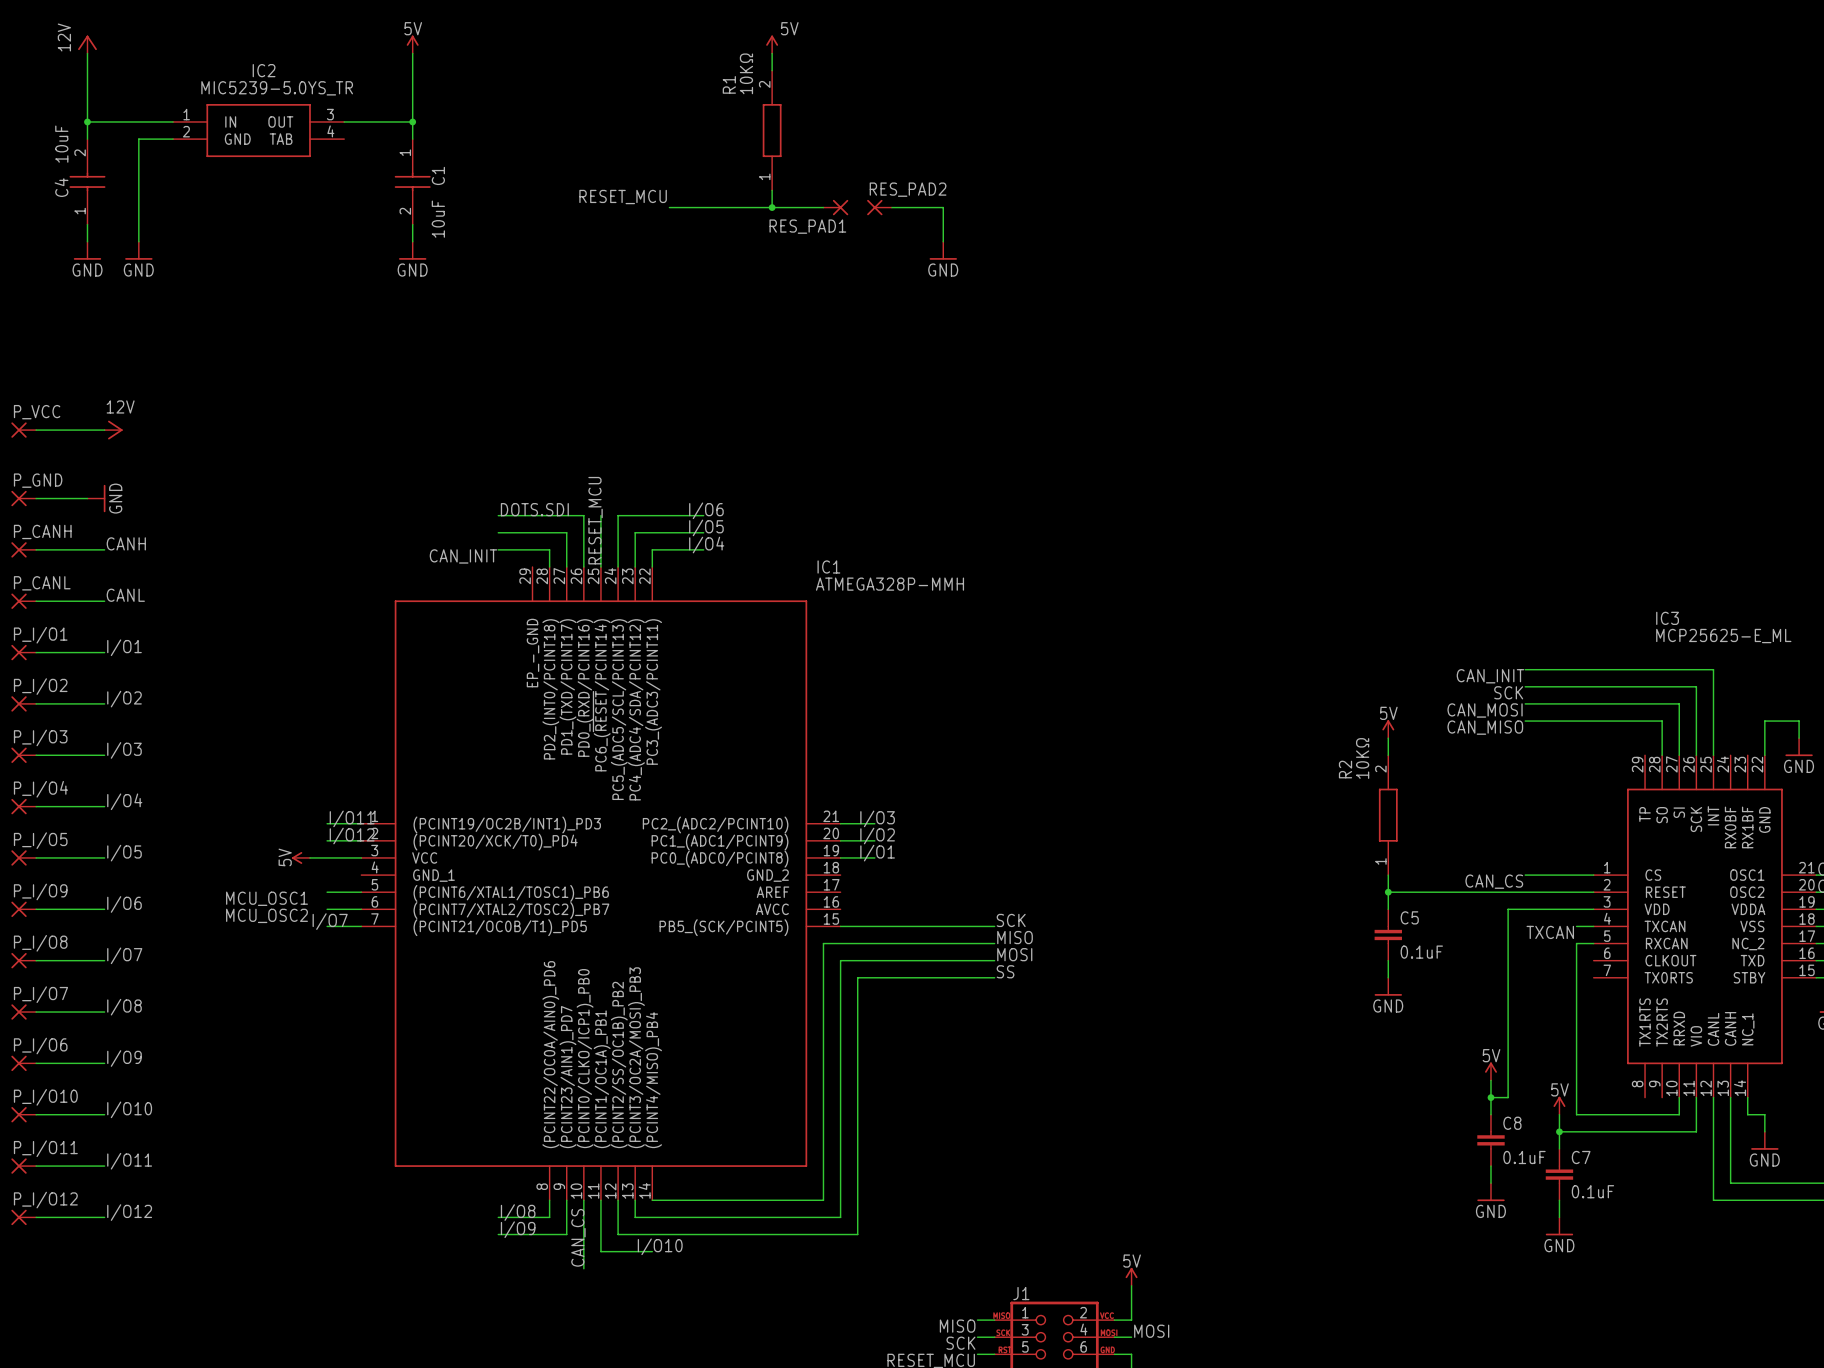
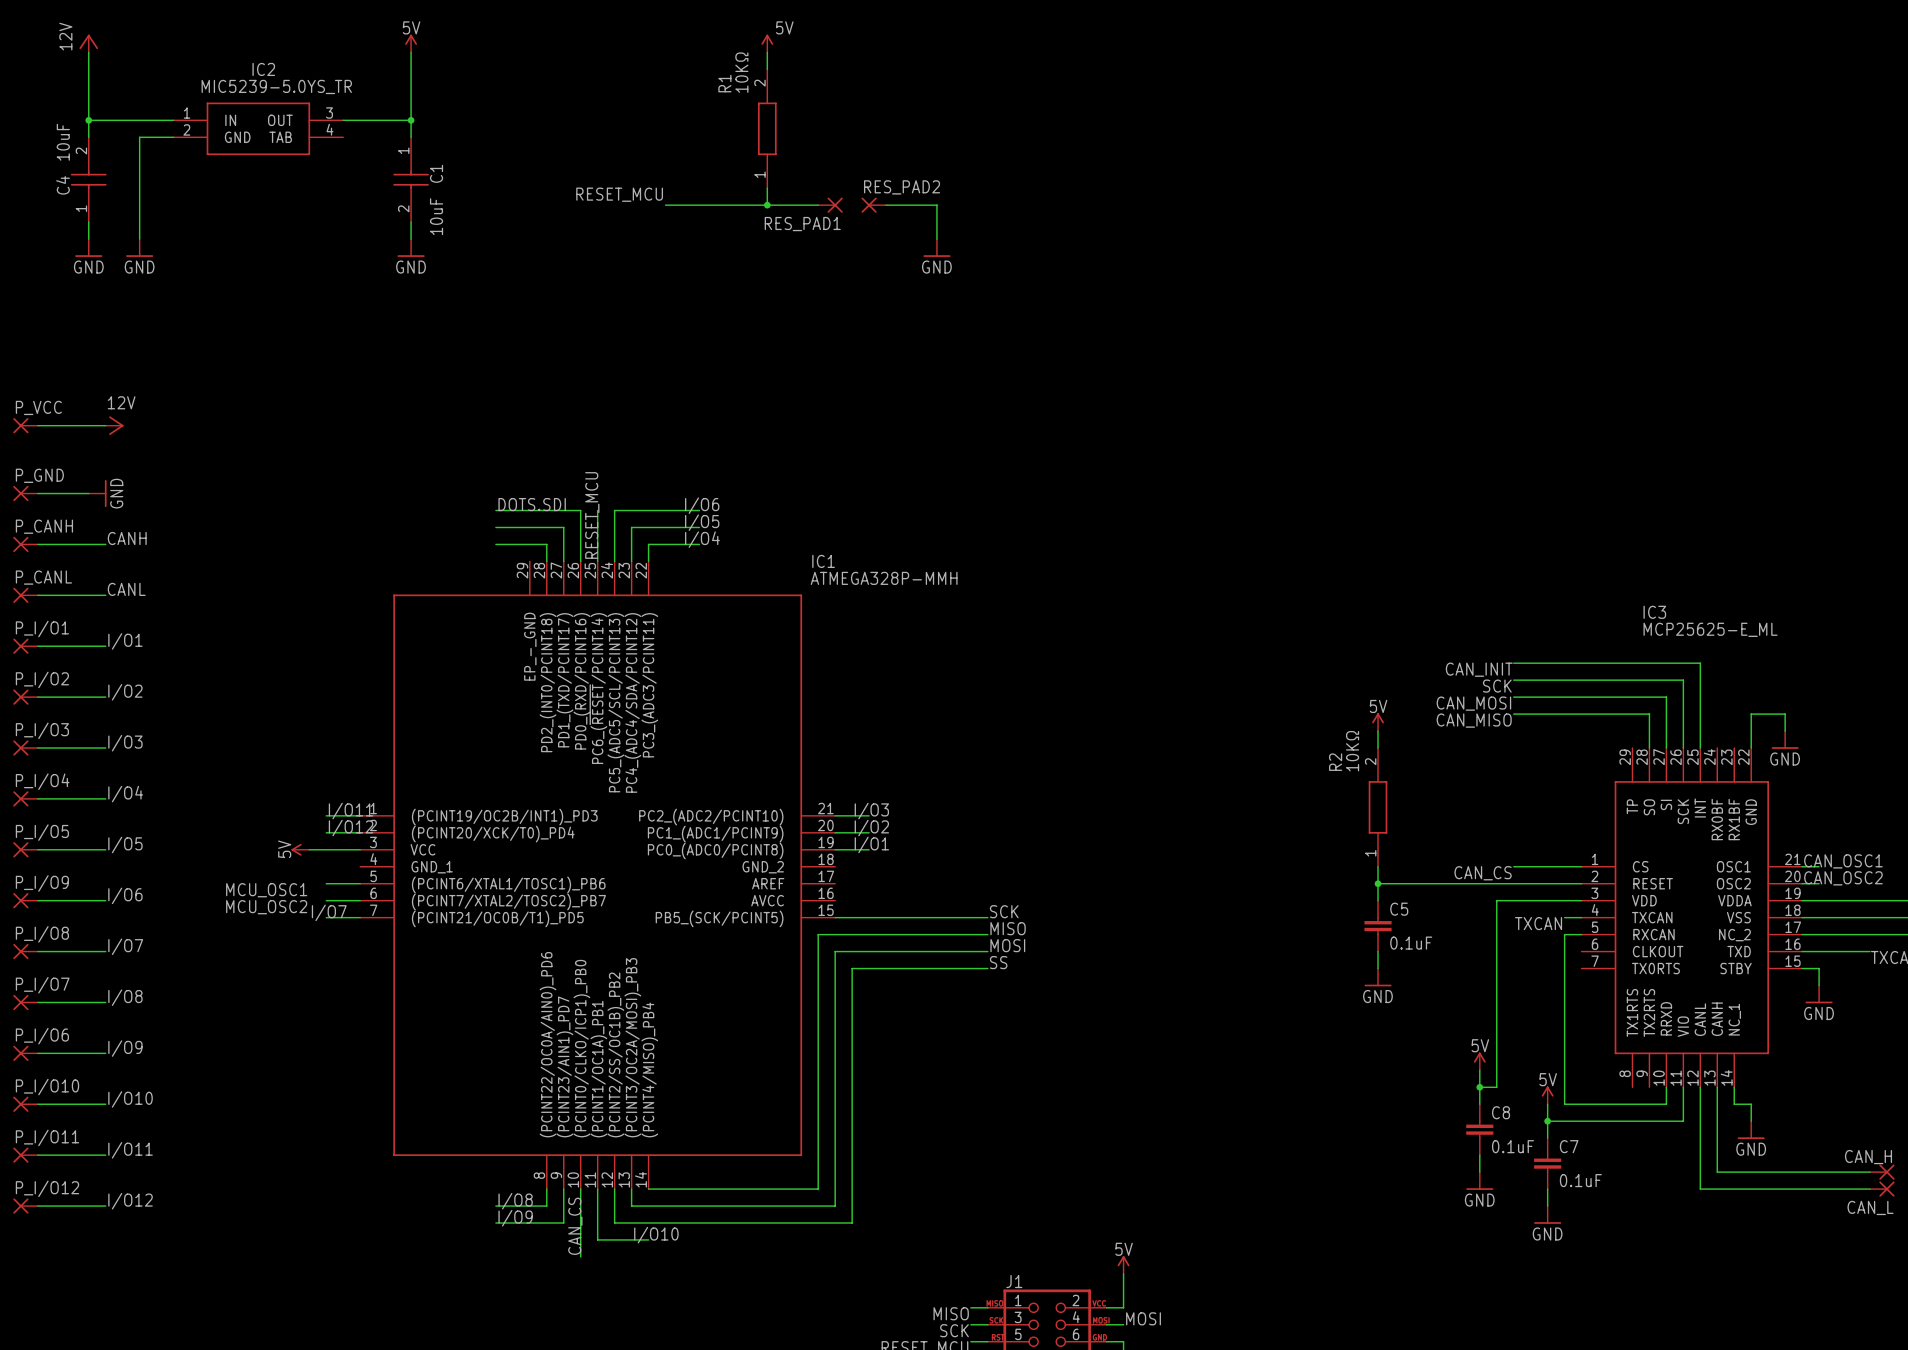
label: CAN_INIT (463, 556) -> none

